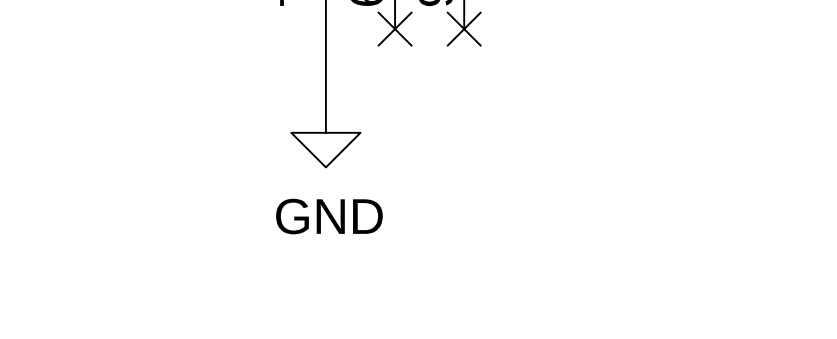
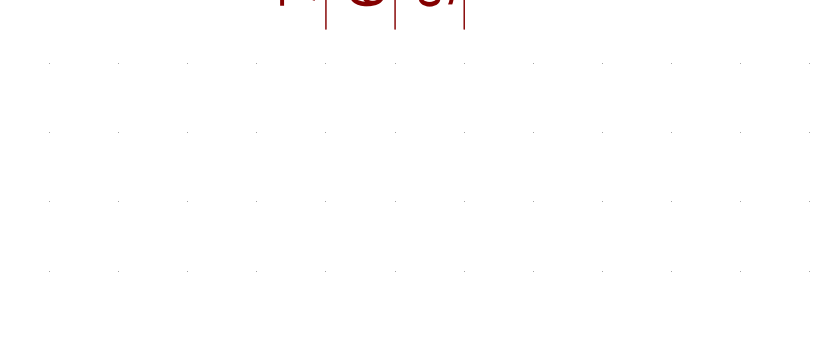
wire: (325, 29) (325, 98) -> none
no-connect mark: (395, 29) -> none
no-connect mark: (464, 29) -> none
power symbol: GND (325, 132) -> none

